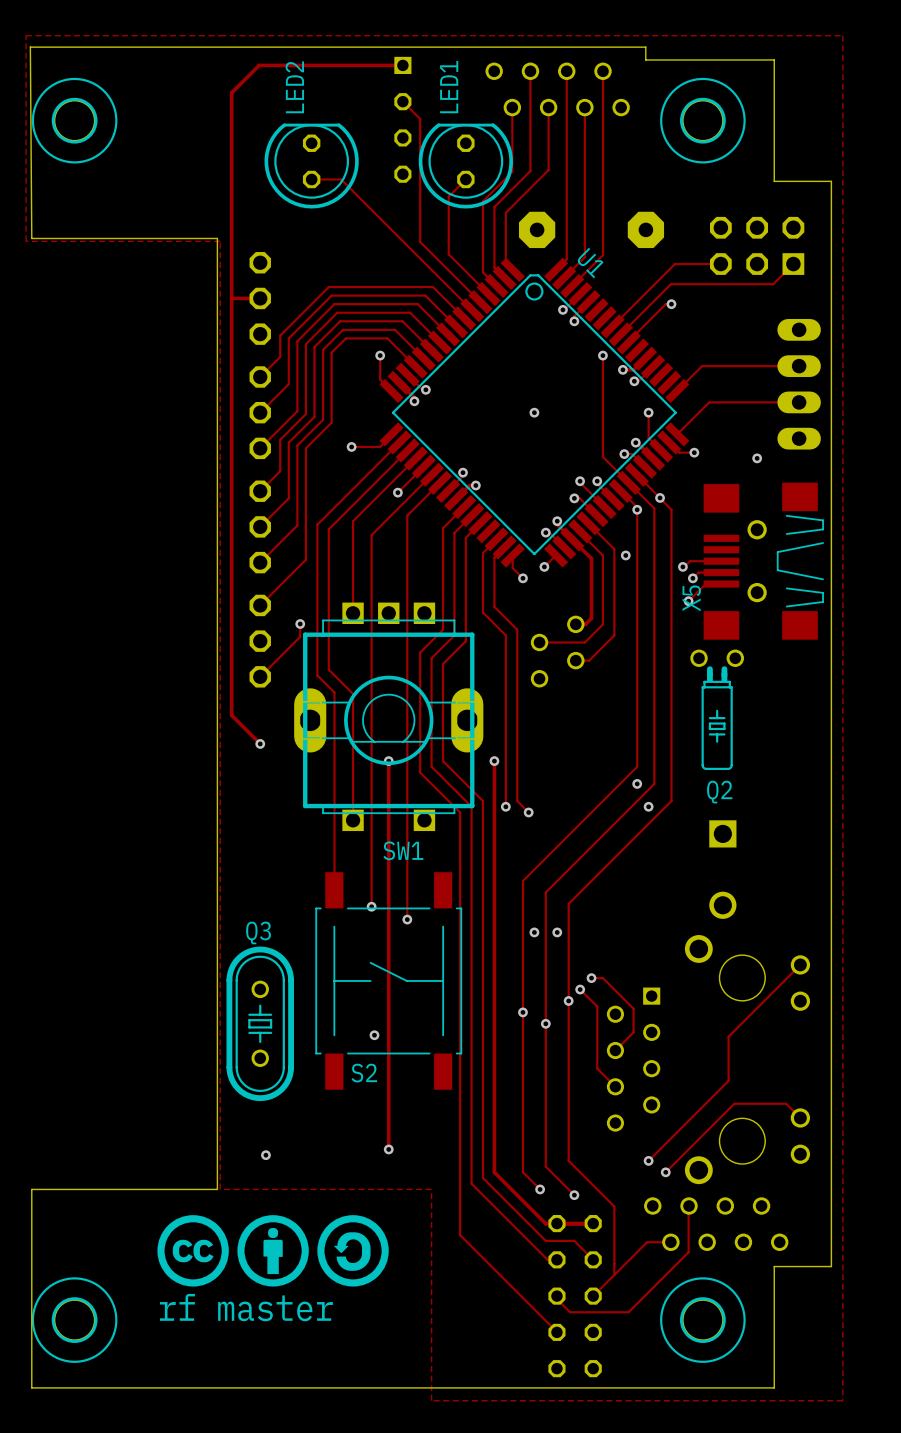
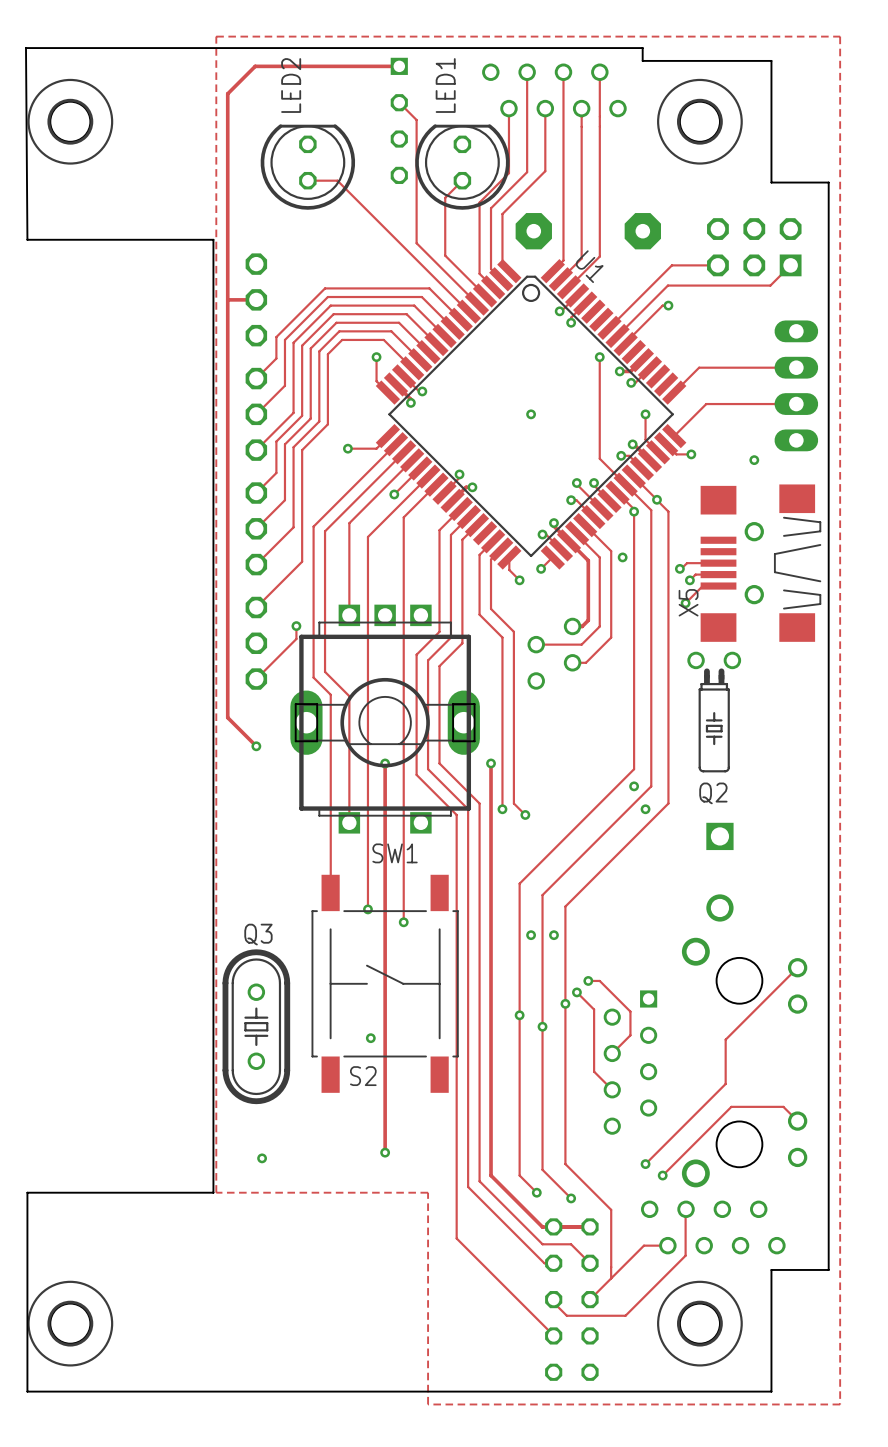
zone outline: (220, 35) (26, 35) (26, 241) (220, 241) -> (216, 36) (216, 242)
drawing: [157, 1215, 389, 1287] -> none
text: rf master (246, 1307) -> none

